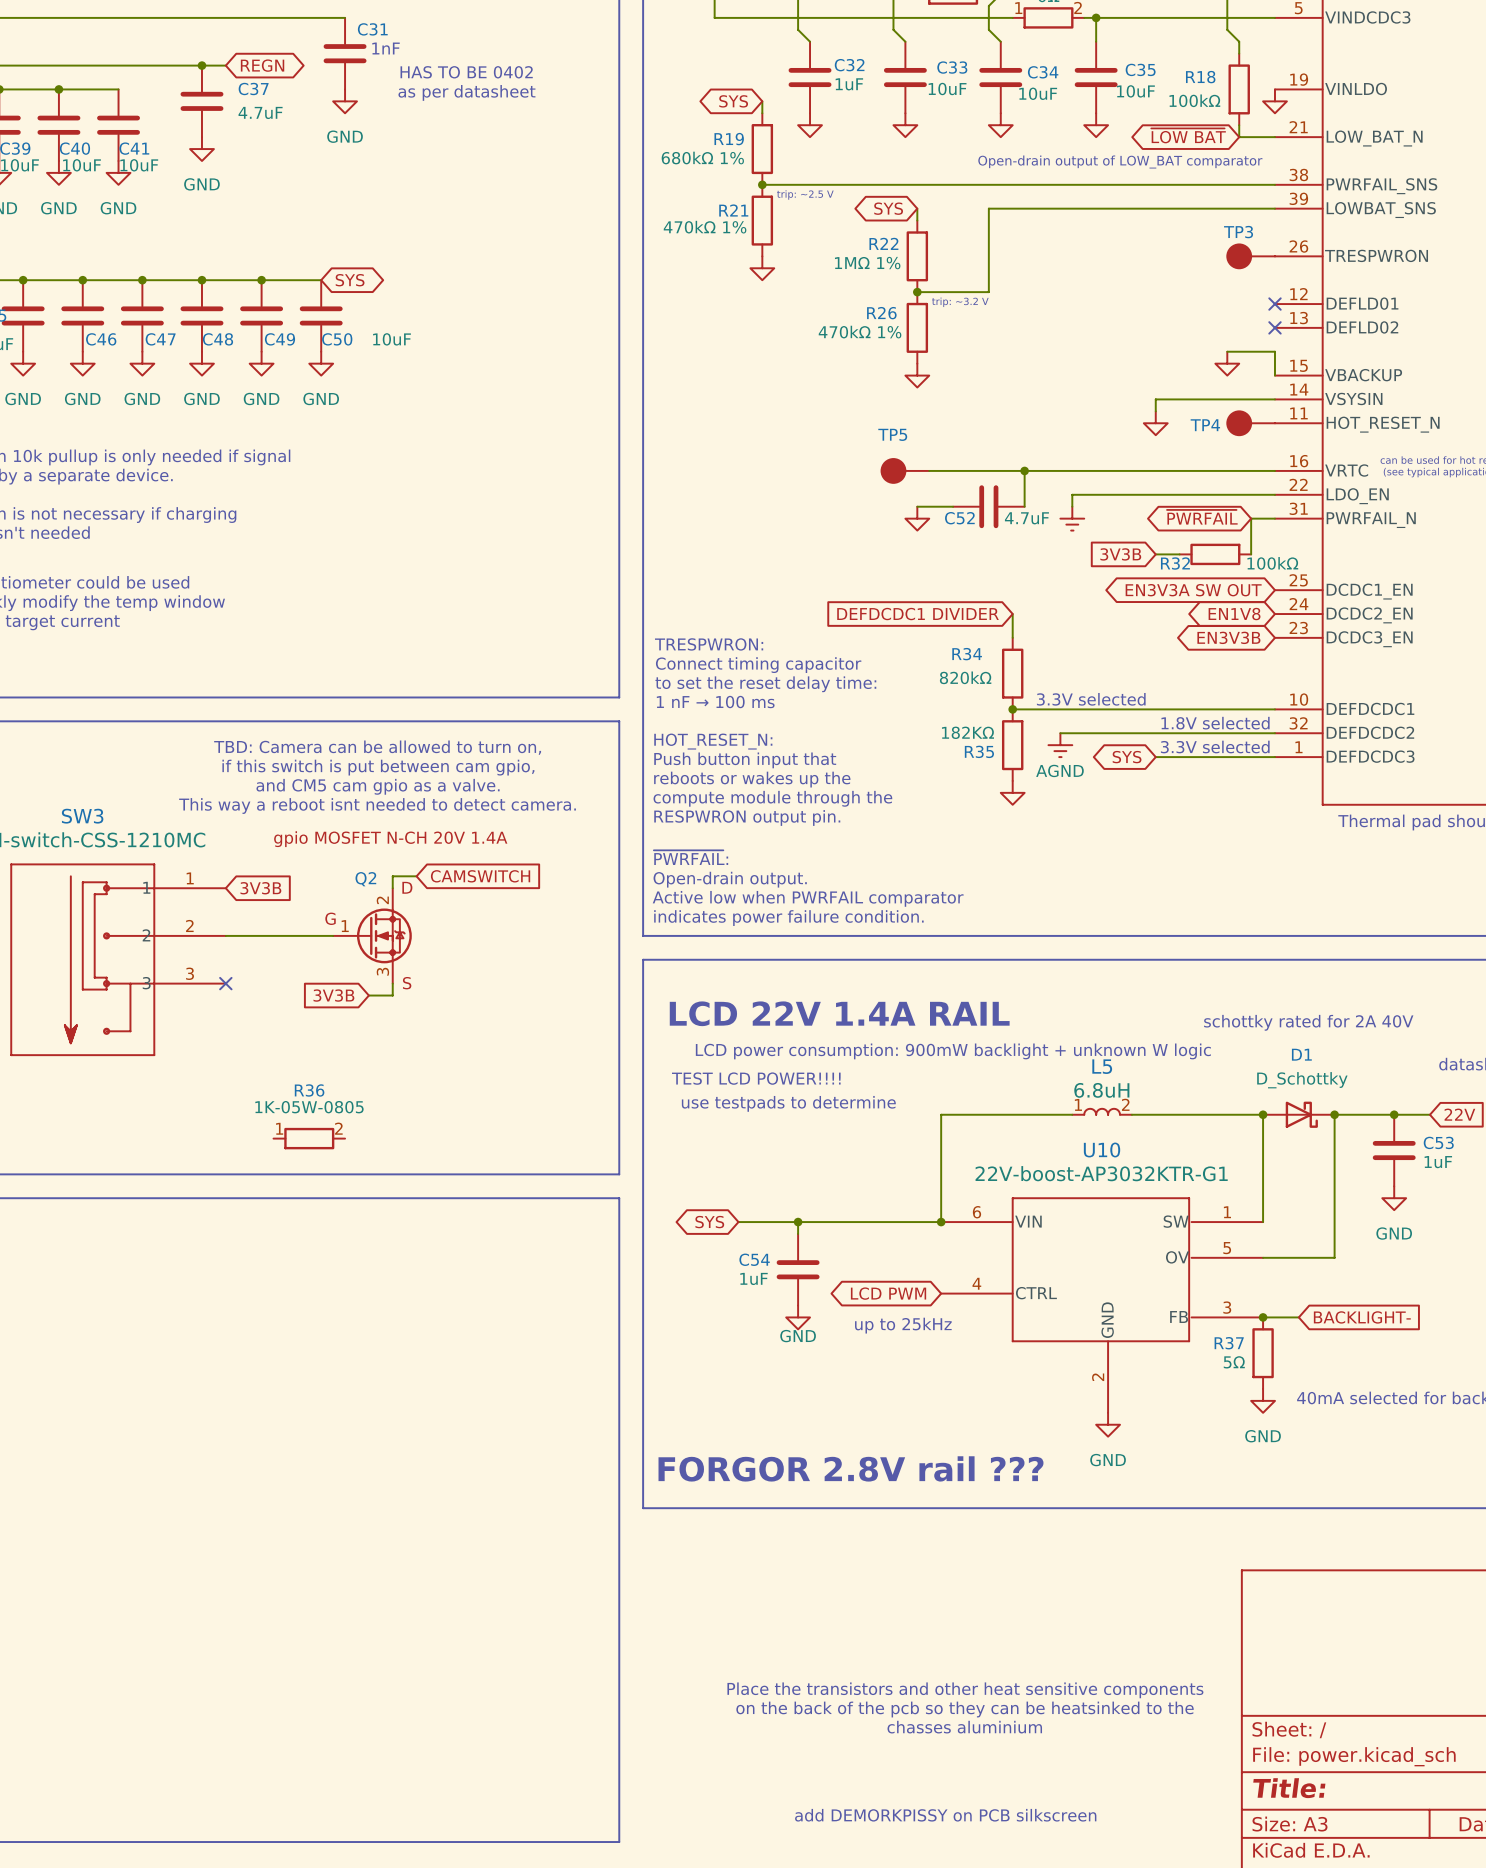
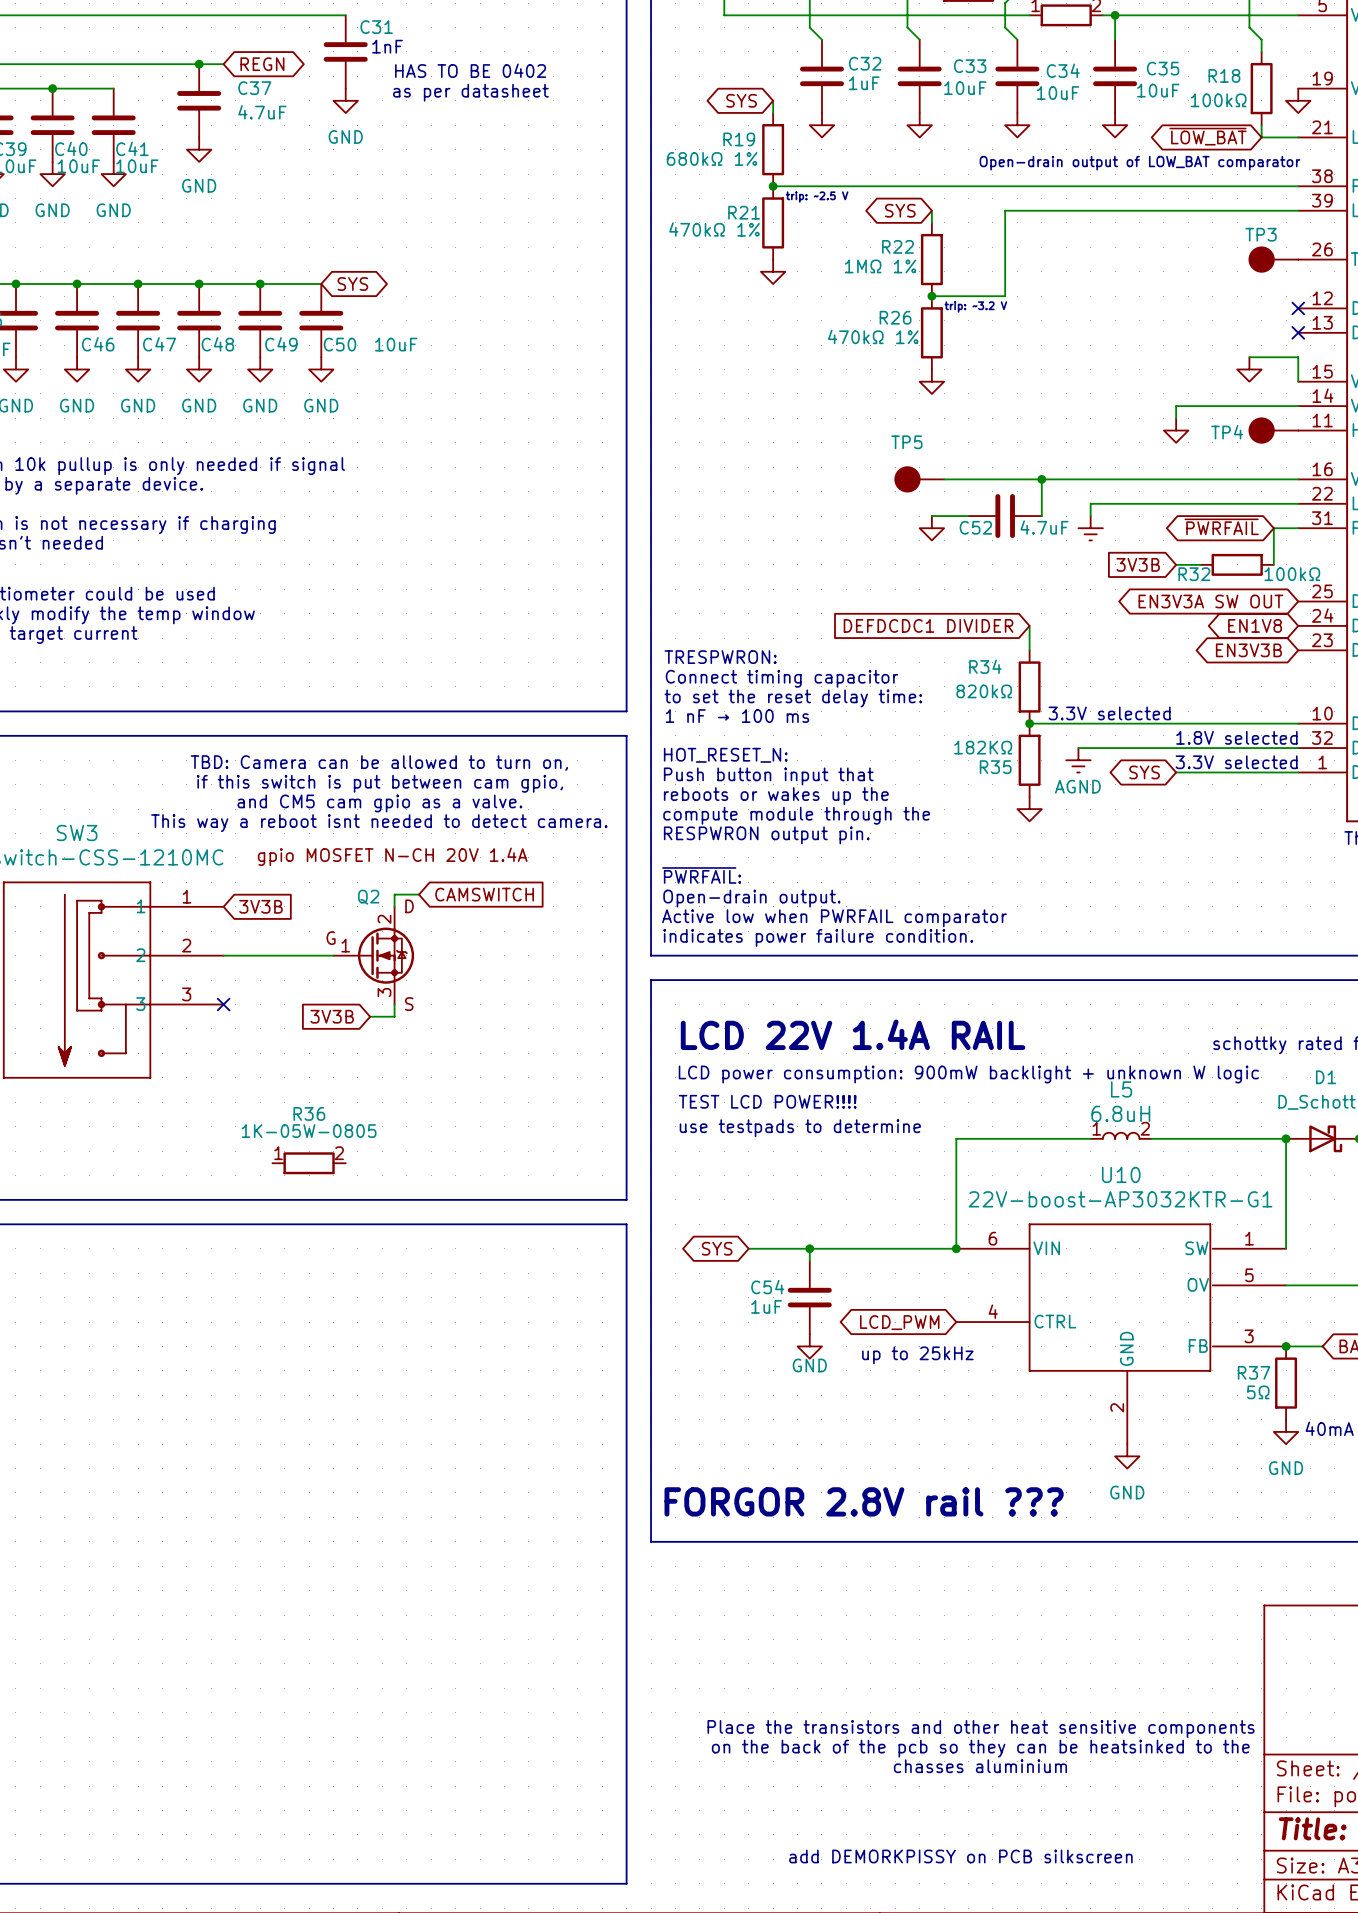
global label: ~{LOW BAT} (1188, 135) -> ~{LOW_BAT} (1207, 136)
global label: LCD PWM (888, 1293) -> LCD_PWM (899, 1322)

